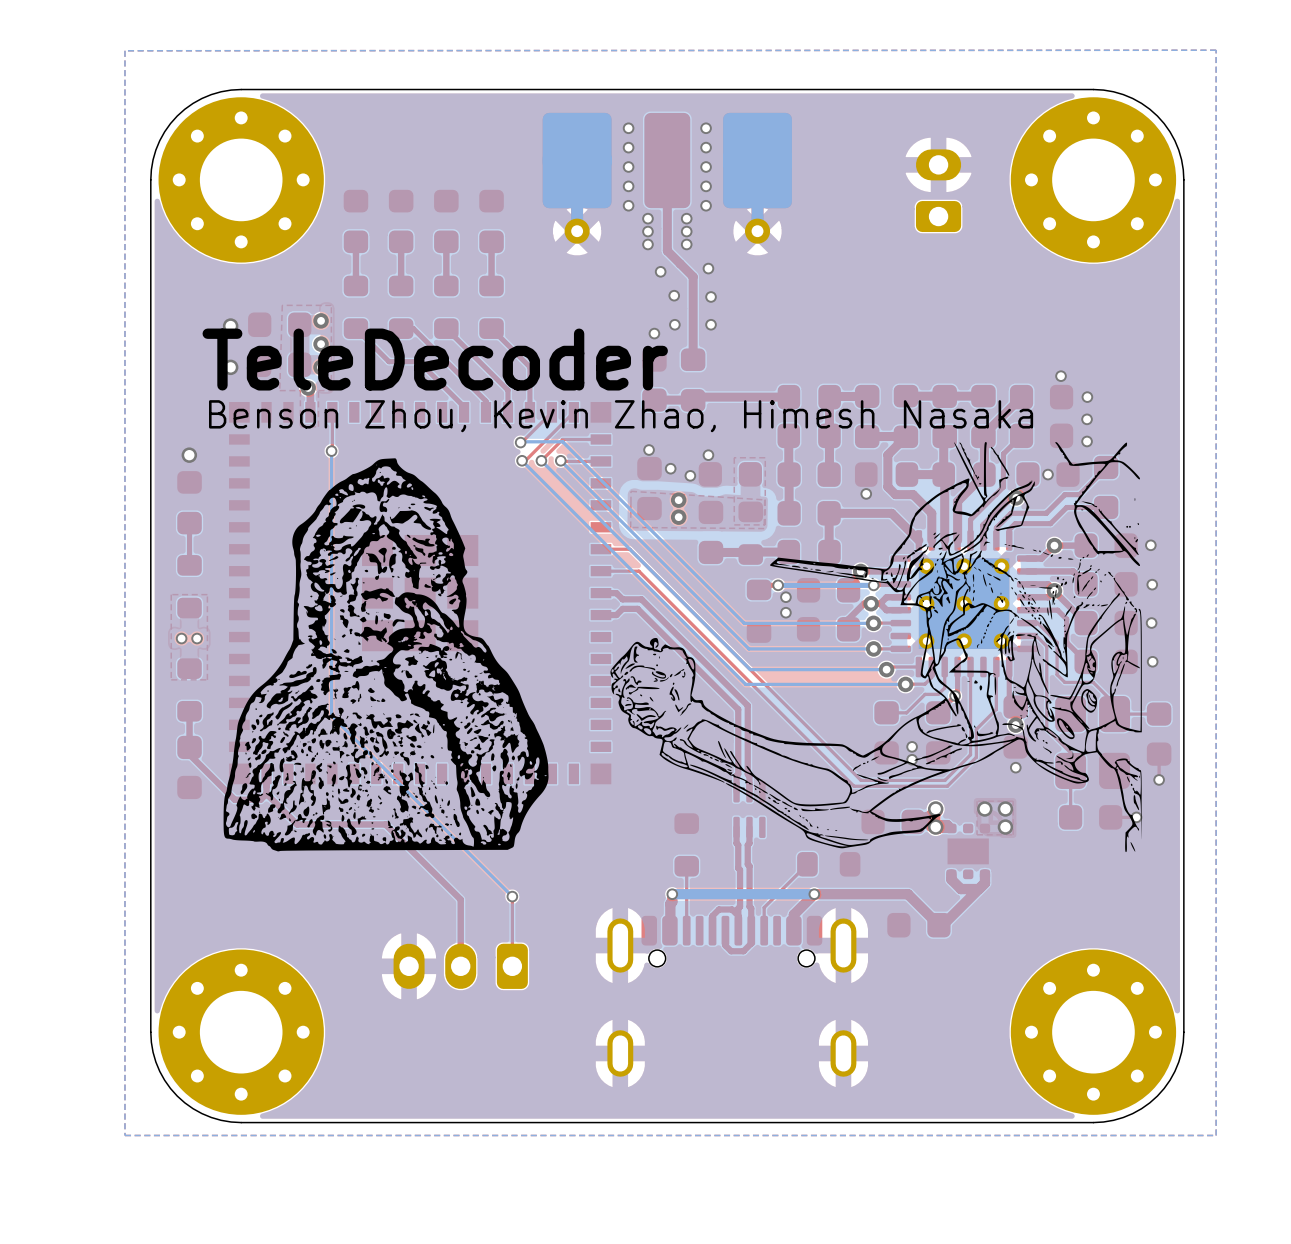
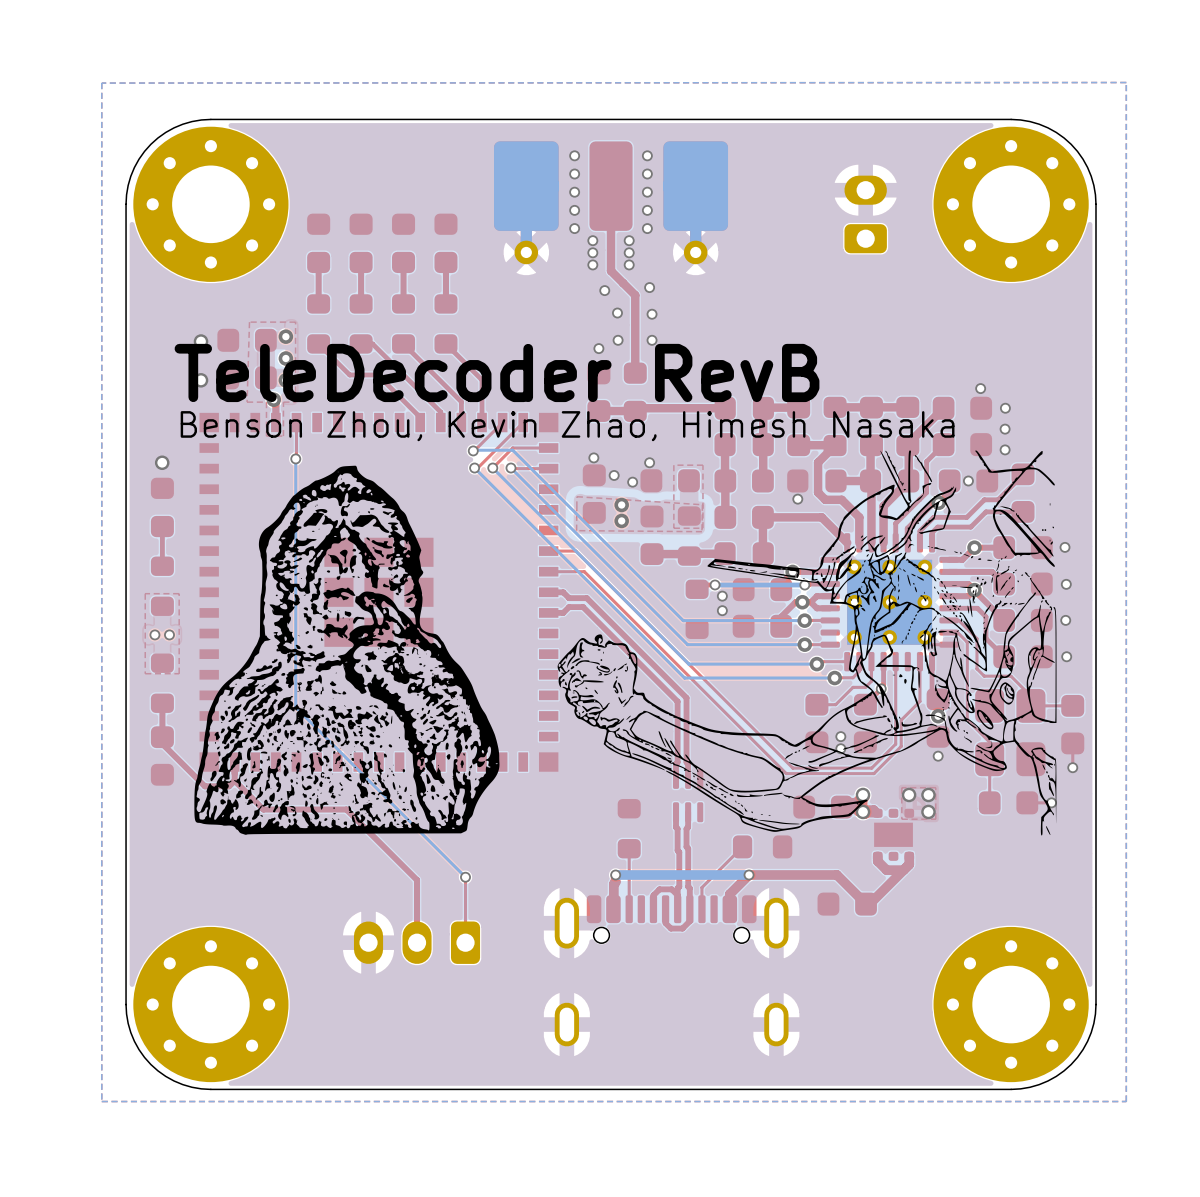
text: TeleDecoder (435, 359) -> TeleDecoder RevB (497, 372)

